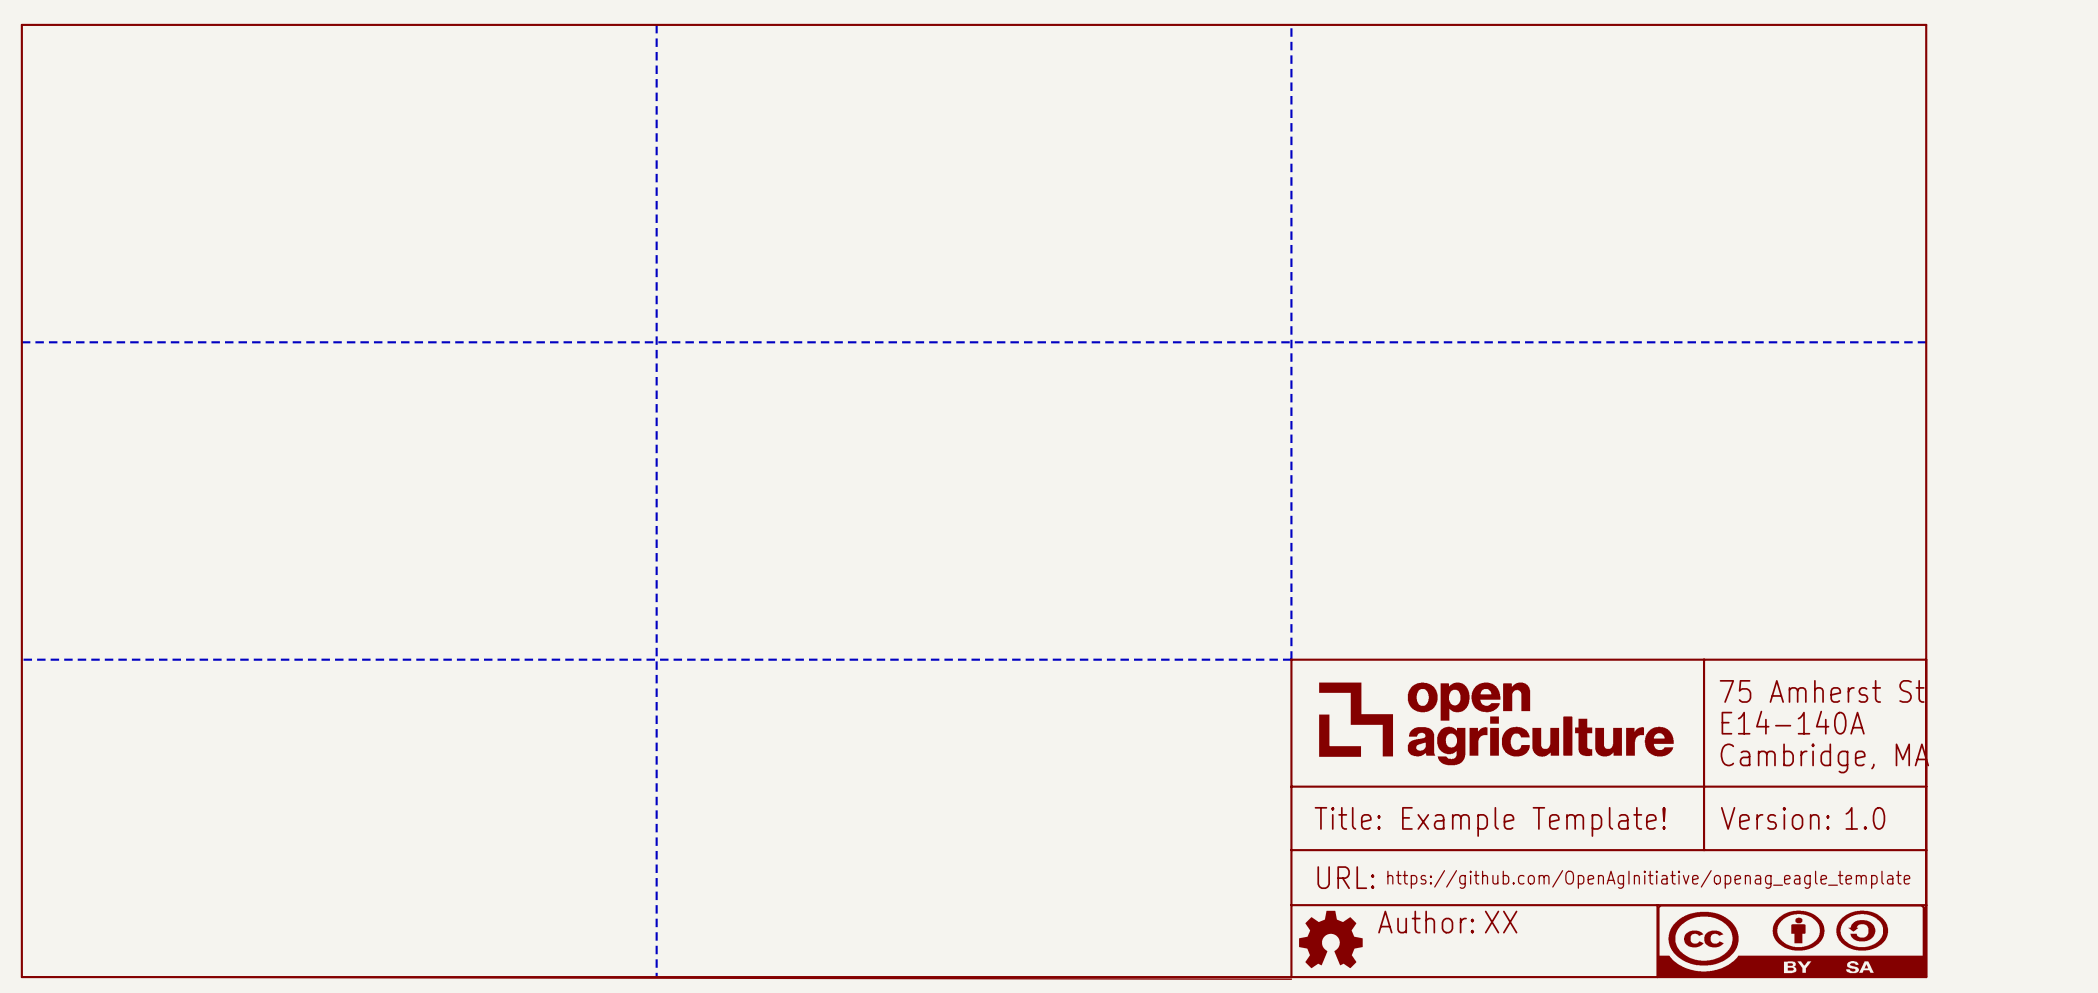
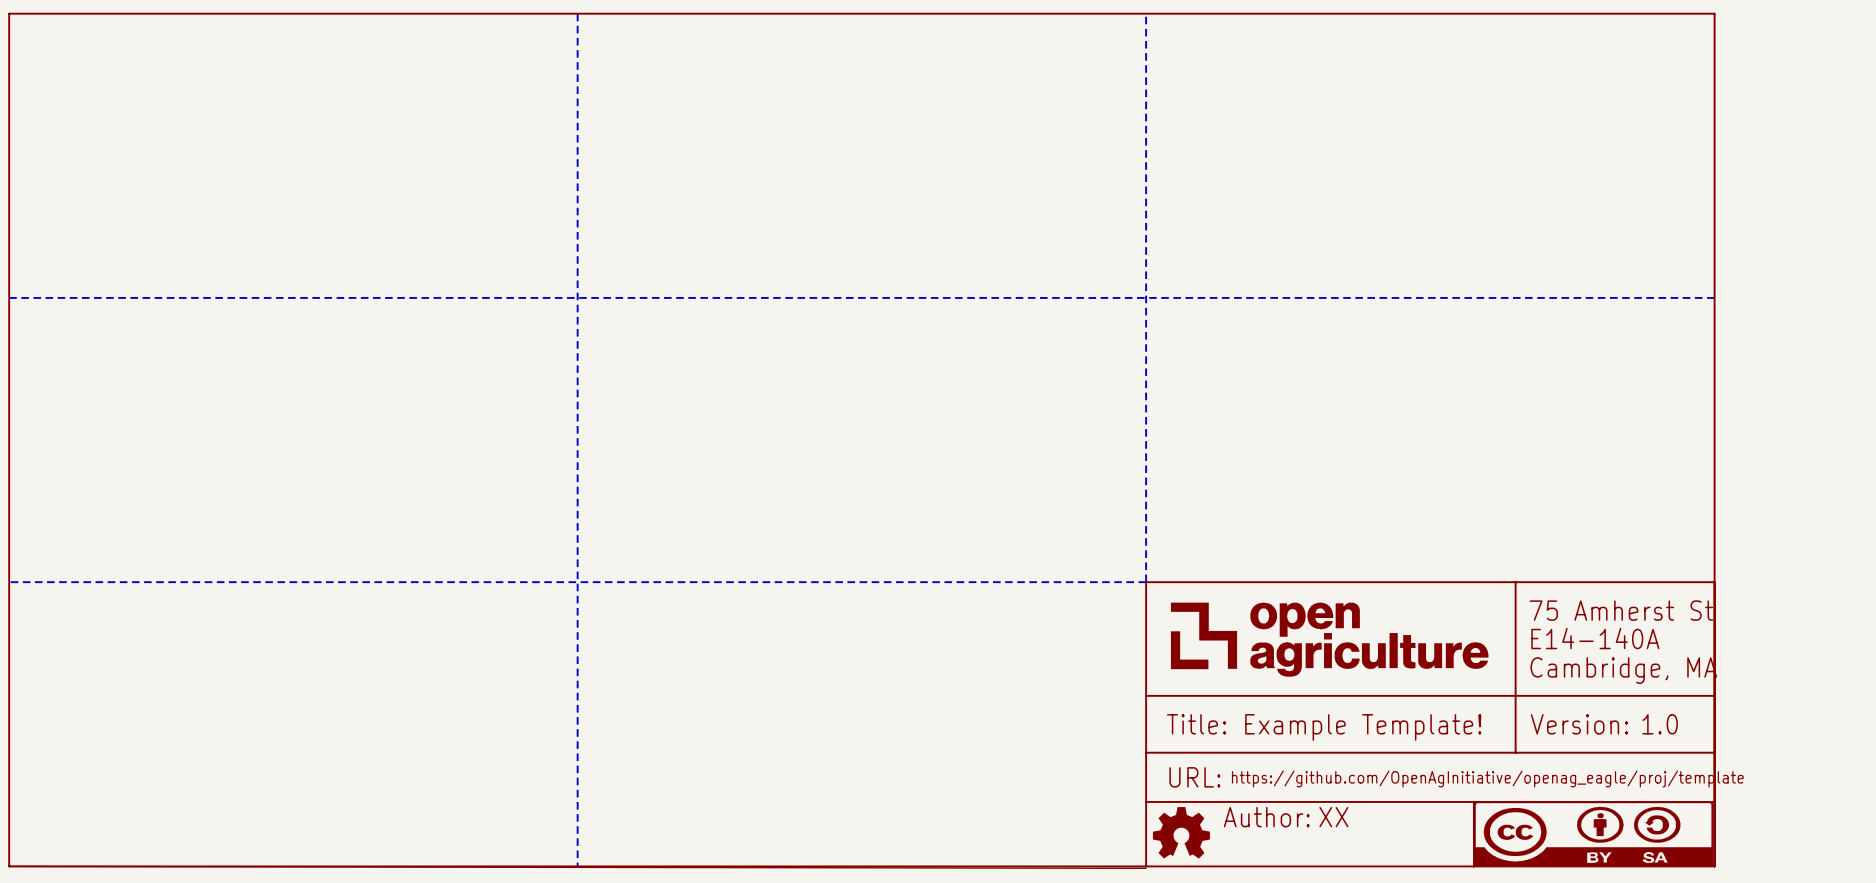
part text: https://github.com/OpenAgInitiative/openag_eagle_template (1648, 879) -> https://github.com/OpenAgInitiative/openag_eagle/proj/template (1487, 778)

